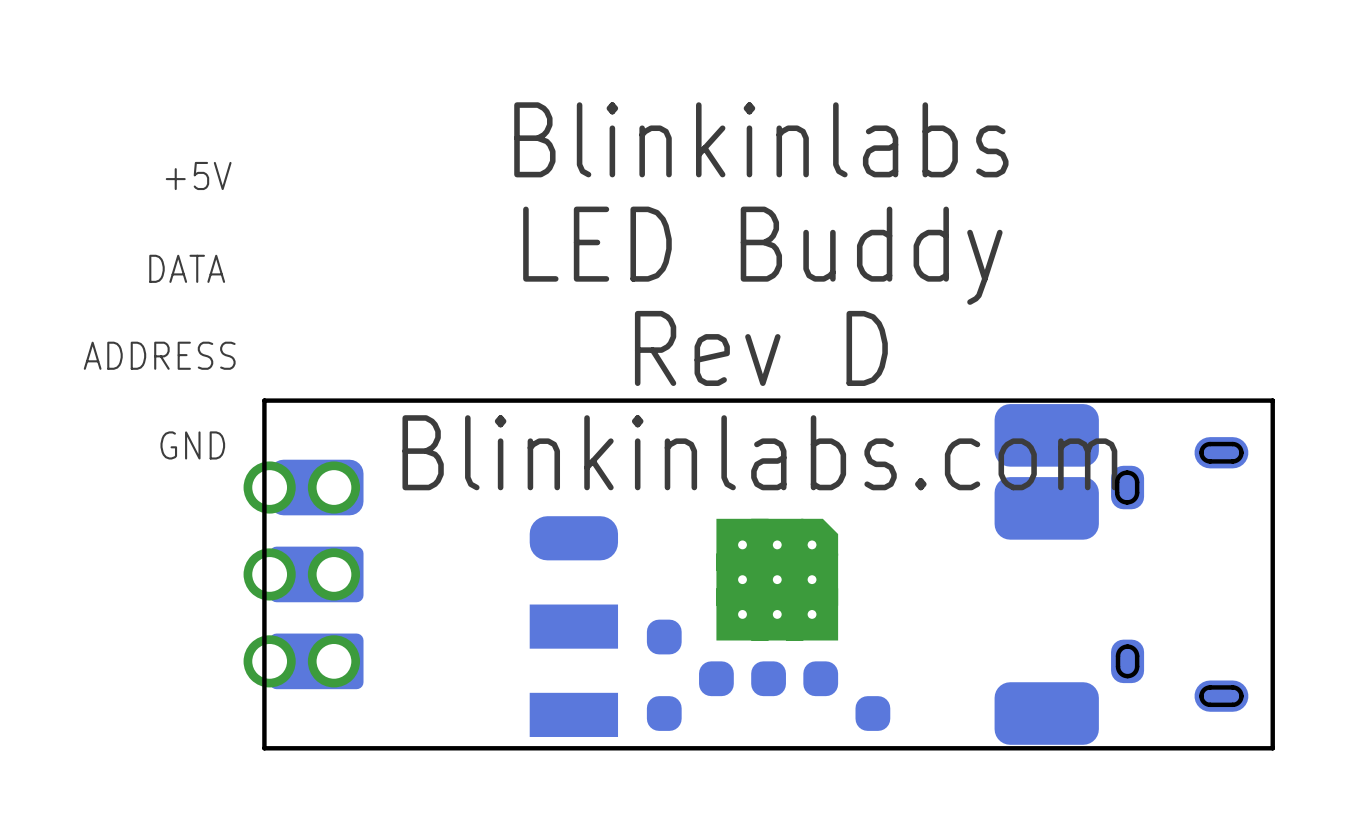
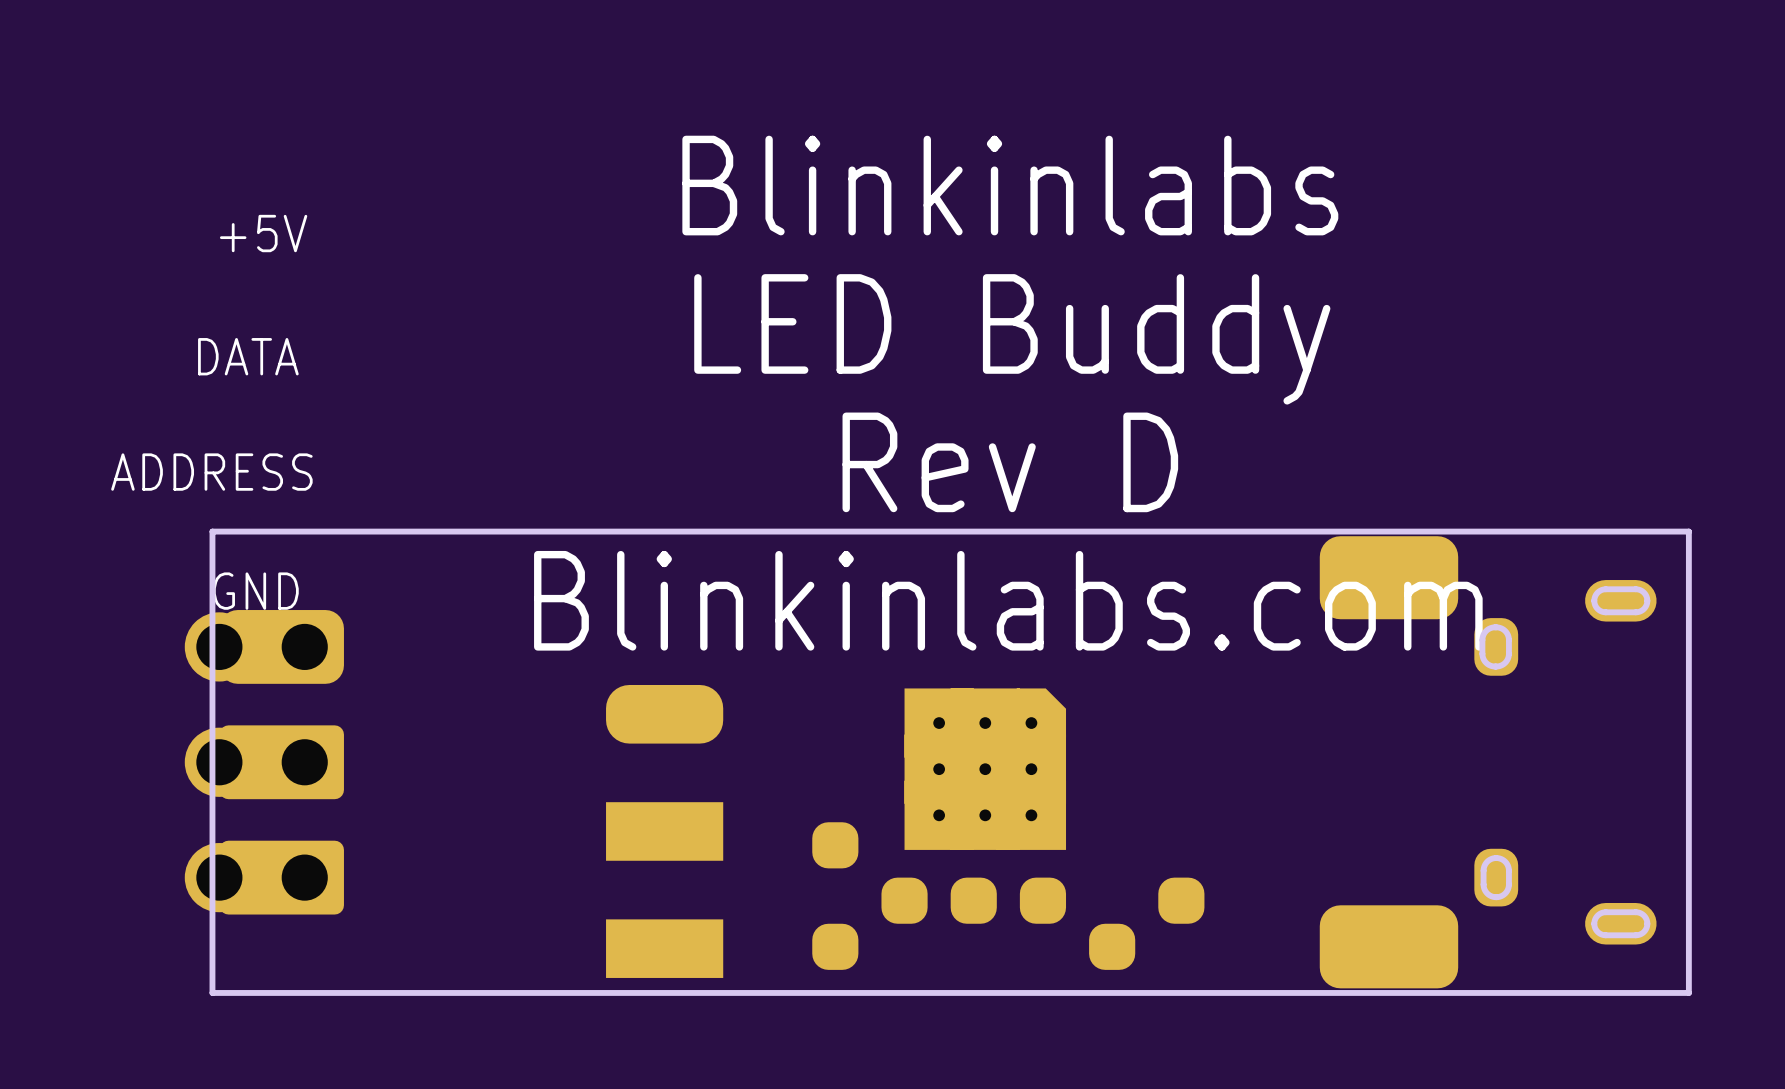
board edge: (264, 400) (264, 748) -> (350, 531) (212, 531) (212, 992) (350, 992)
part: (1046, 508) -> none
part position: (303, 574) -> (264, 762)
part position: (777, 579) -> (985, 769)
part position: (573, 626) -> (664, 831)
part: none -> (835, 845)
part: (664, 637) -> none
part: none -> (904, 900)
part: (716, 678) -> none
part: none -> (973, 900)
part: (768, 678) -> none
part: none -> (1042, 900)
part: (820, 678) -> none
part: none -> (1181, 900)
part: none -> (835, 946)
part: (664, 713) -> none
part: none -> (1112, 946)
part: (872, 713) -> none

